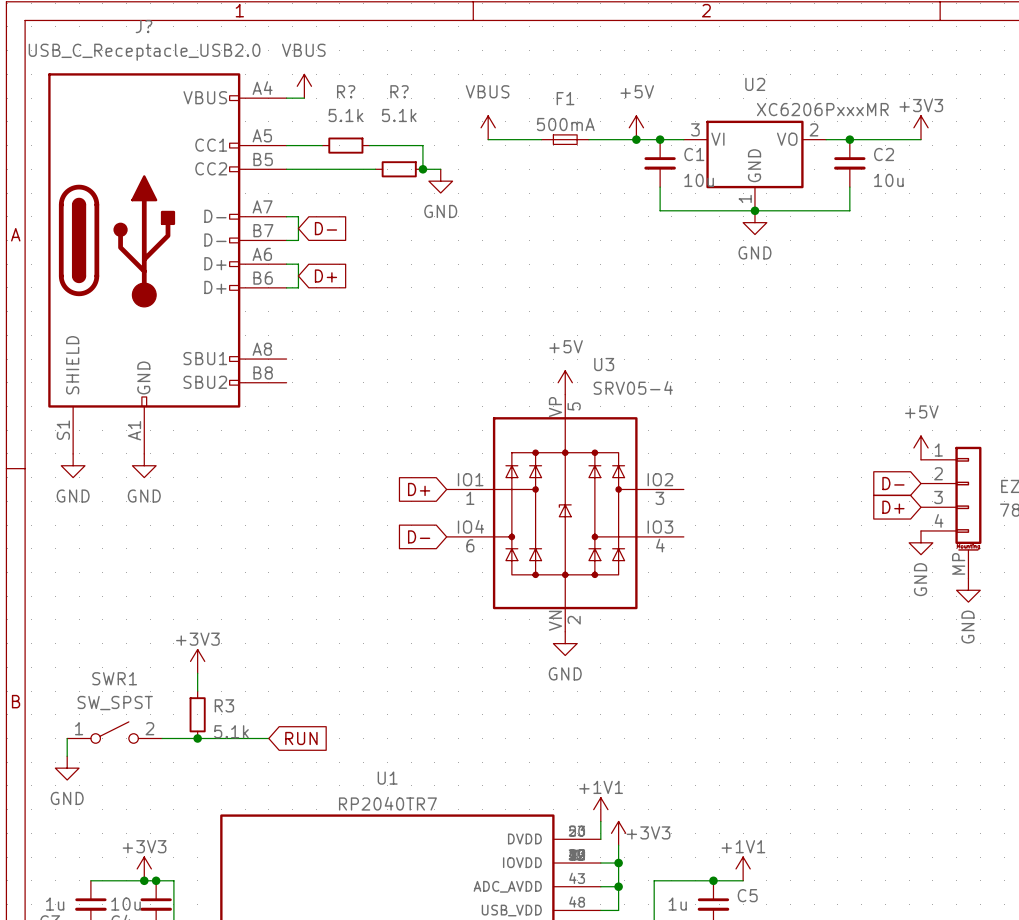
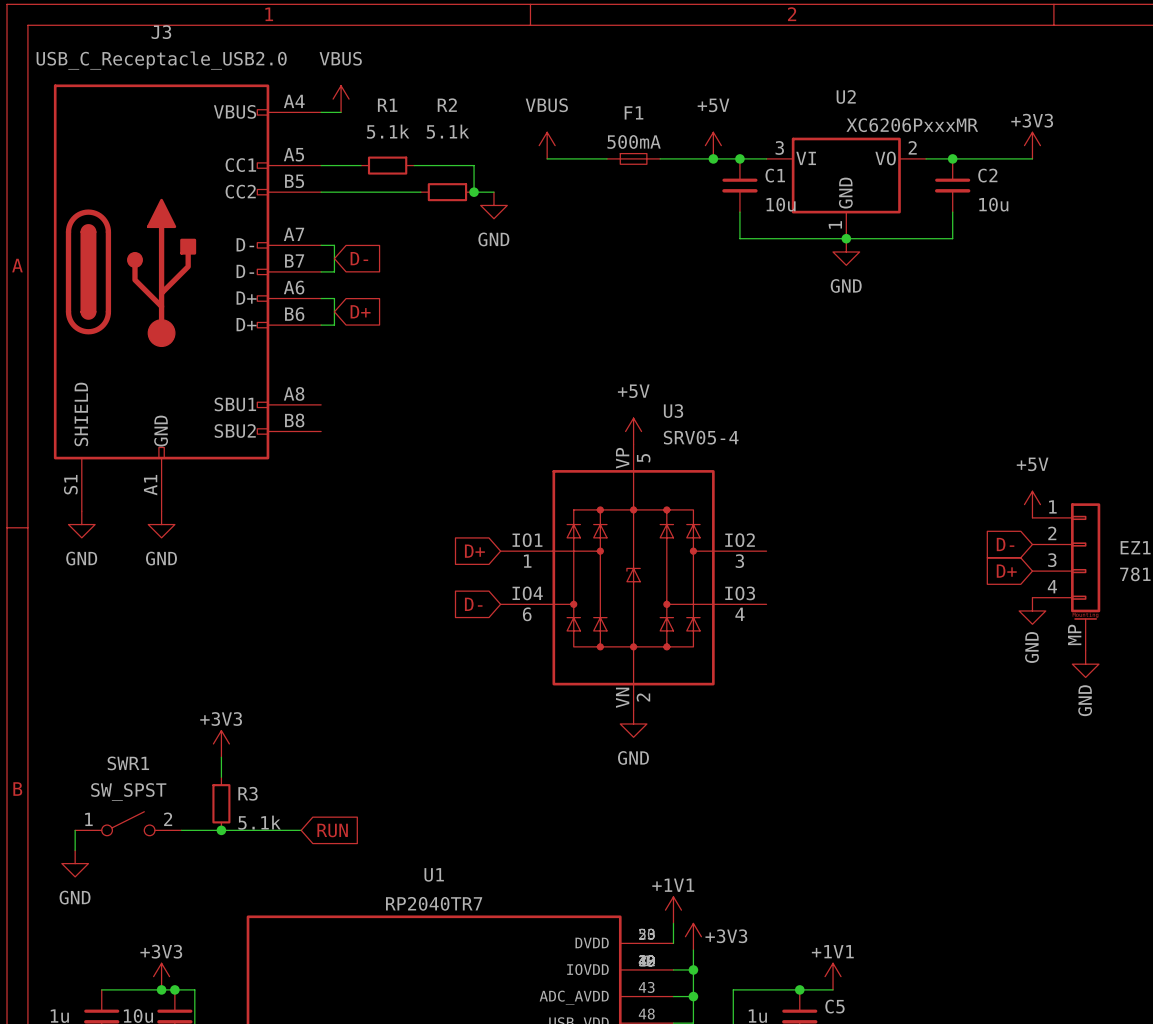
J? name: J? (143, 26) -> J3 (161, 32)
R? name: R? (346, 91) -> R1 (387, 105)
R? name: R? (399, 91) -> R2 (447, 105)

